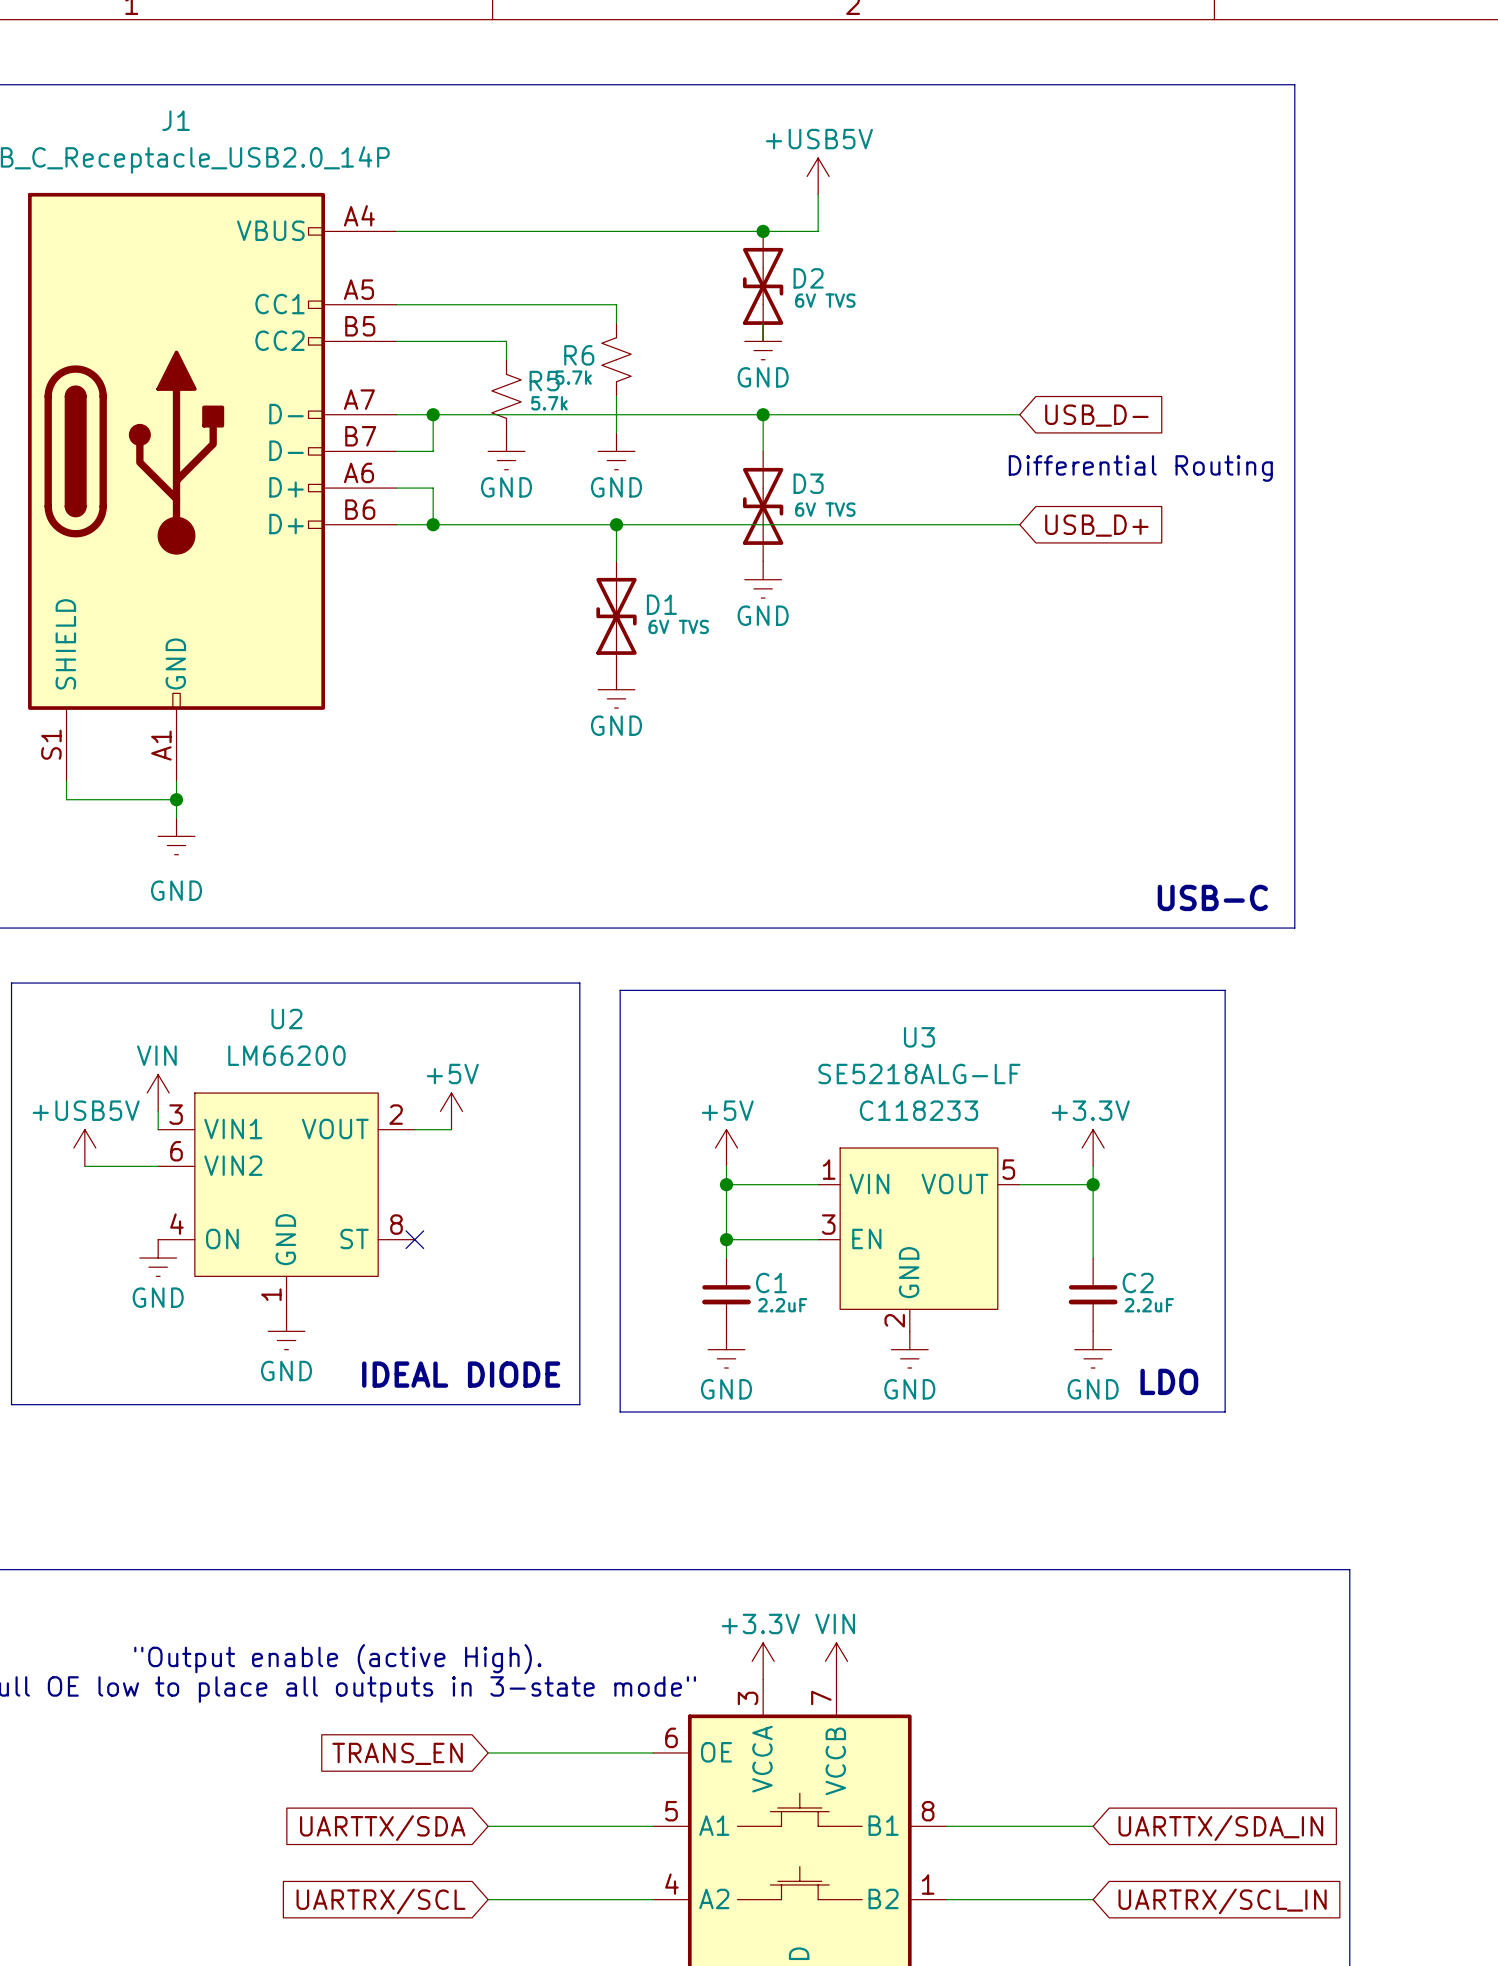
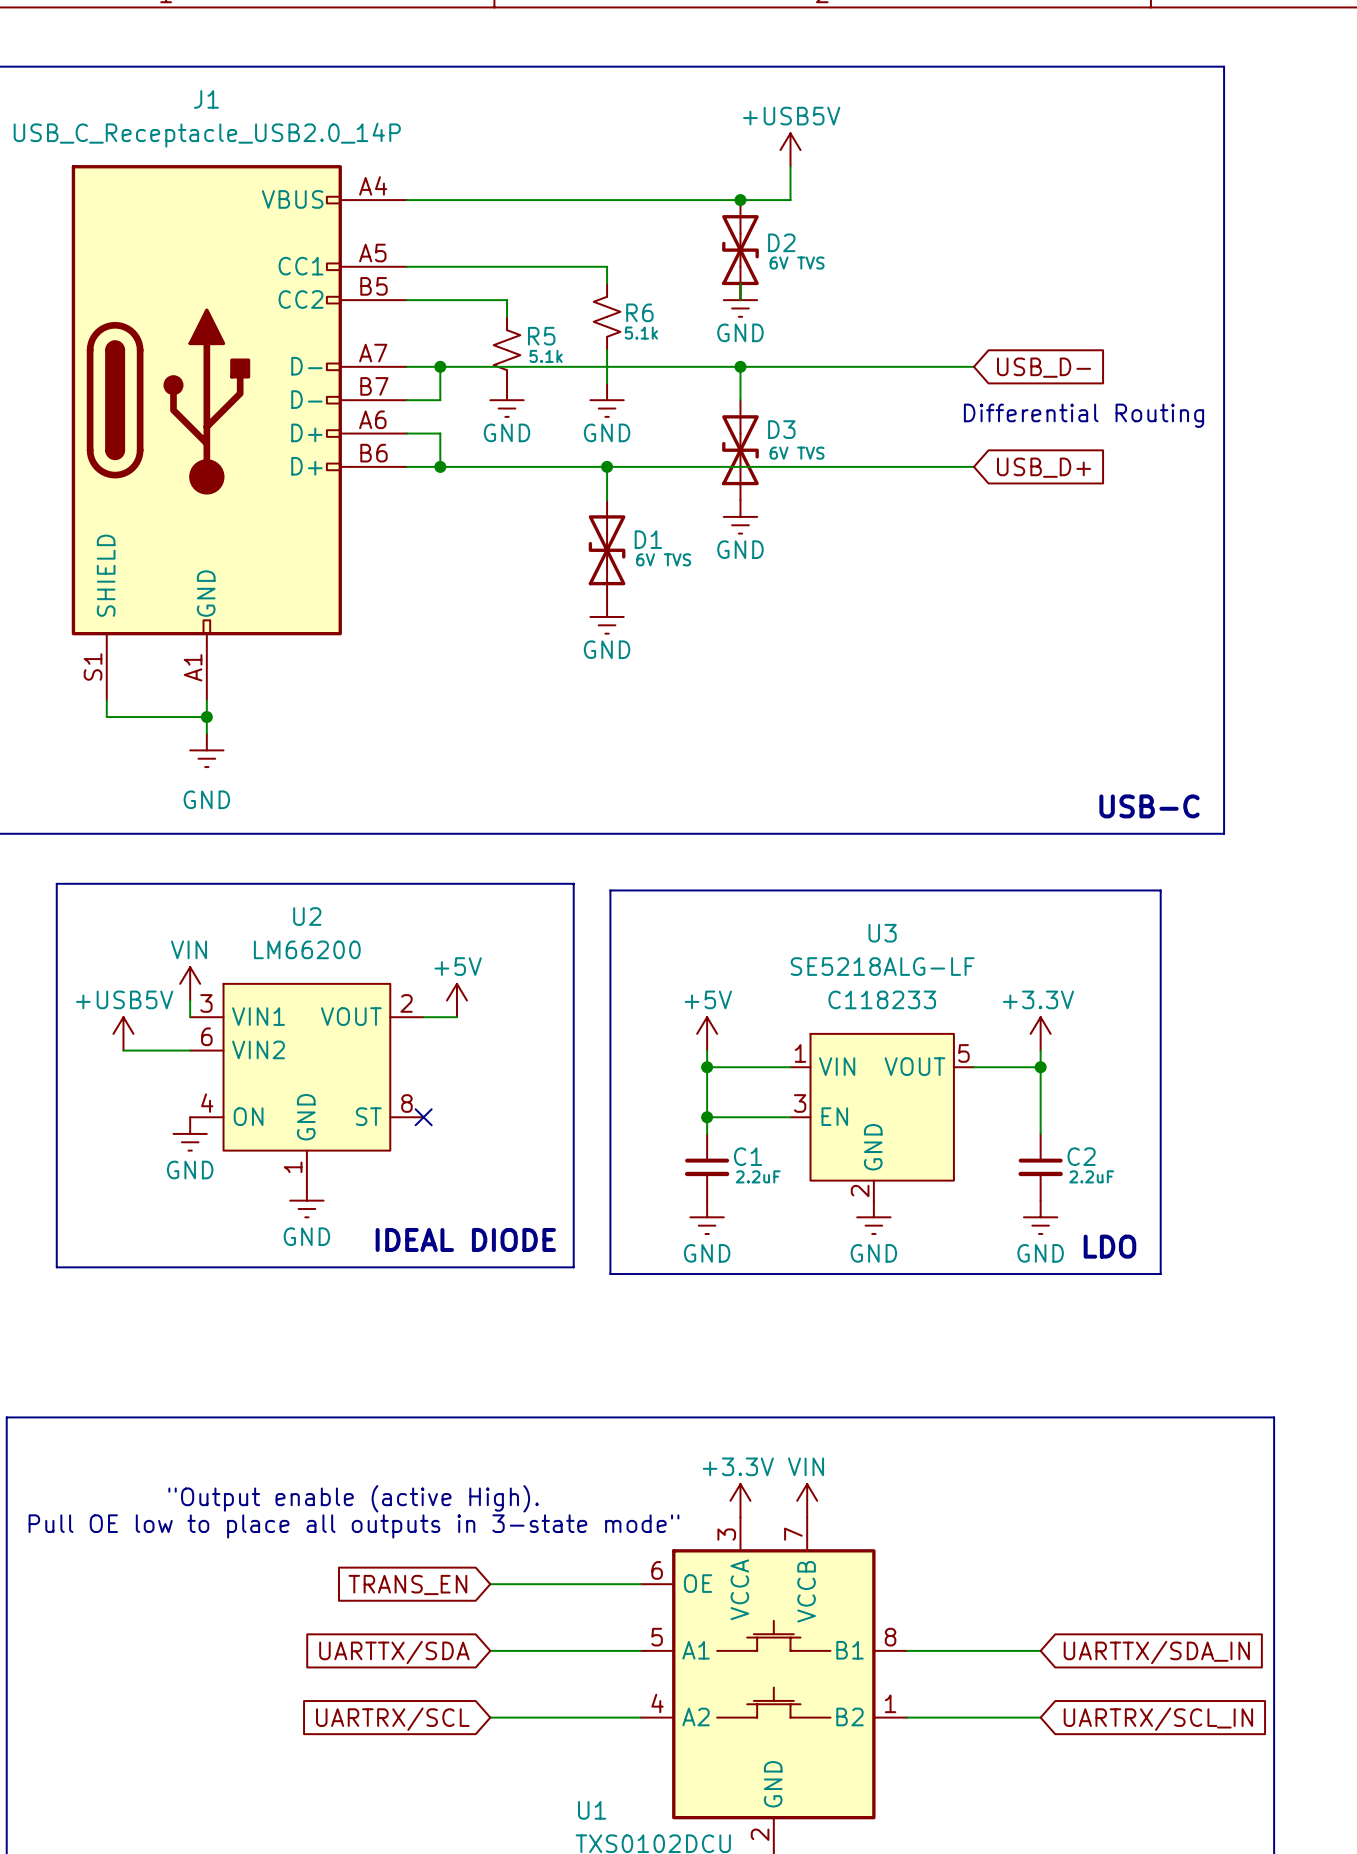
R6 name position: R6 (579, 355) -> R6 (639, 312)
R6 value: 5.7k (573, 377) -> 5.1k (641, 333)
R5 value: 5.7k (549, 403) -> 5.1k (546, 356)

